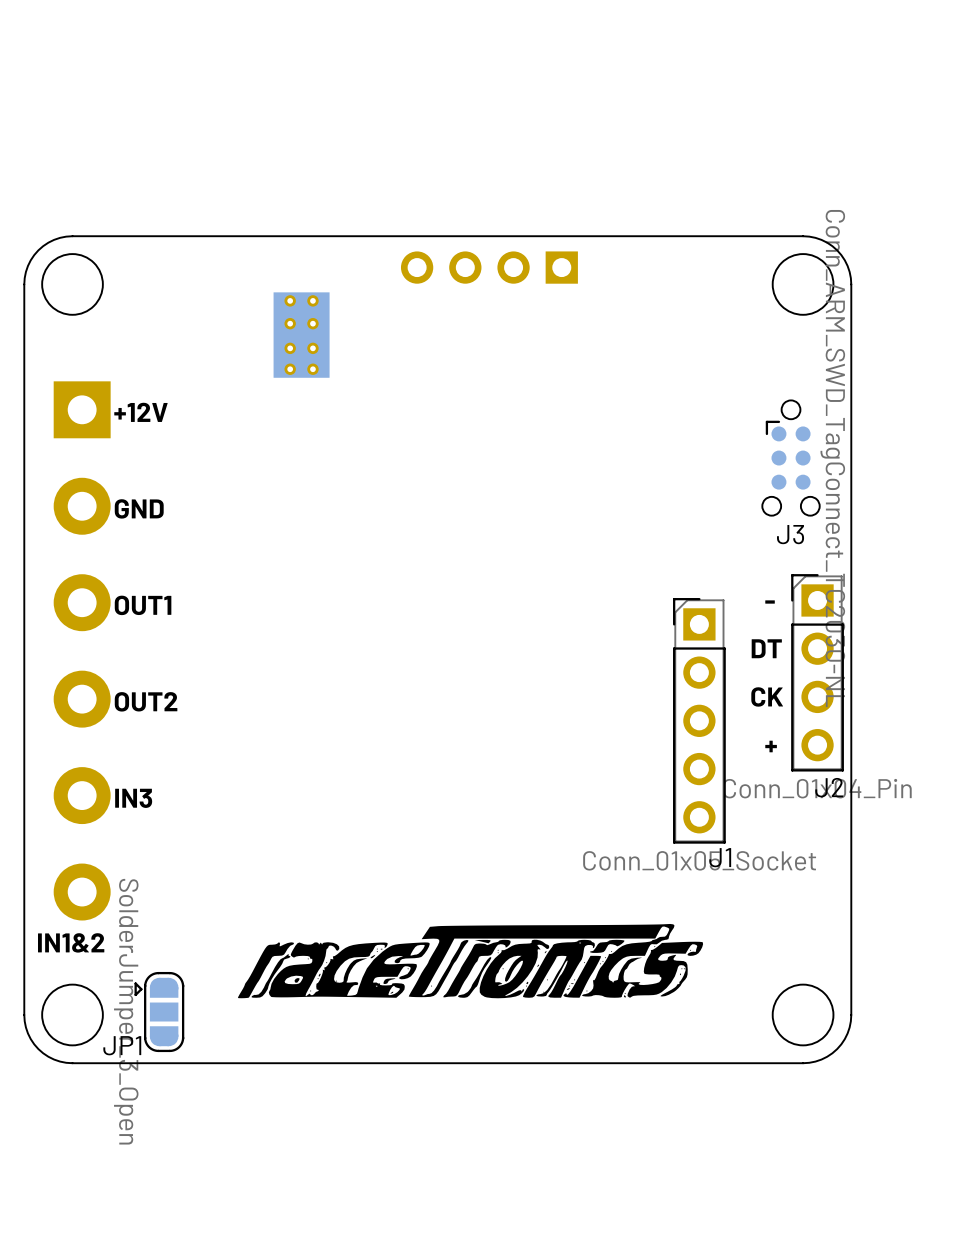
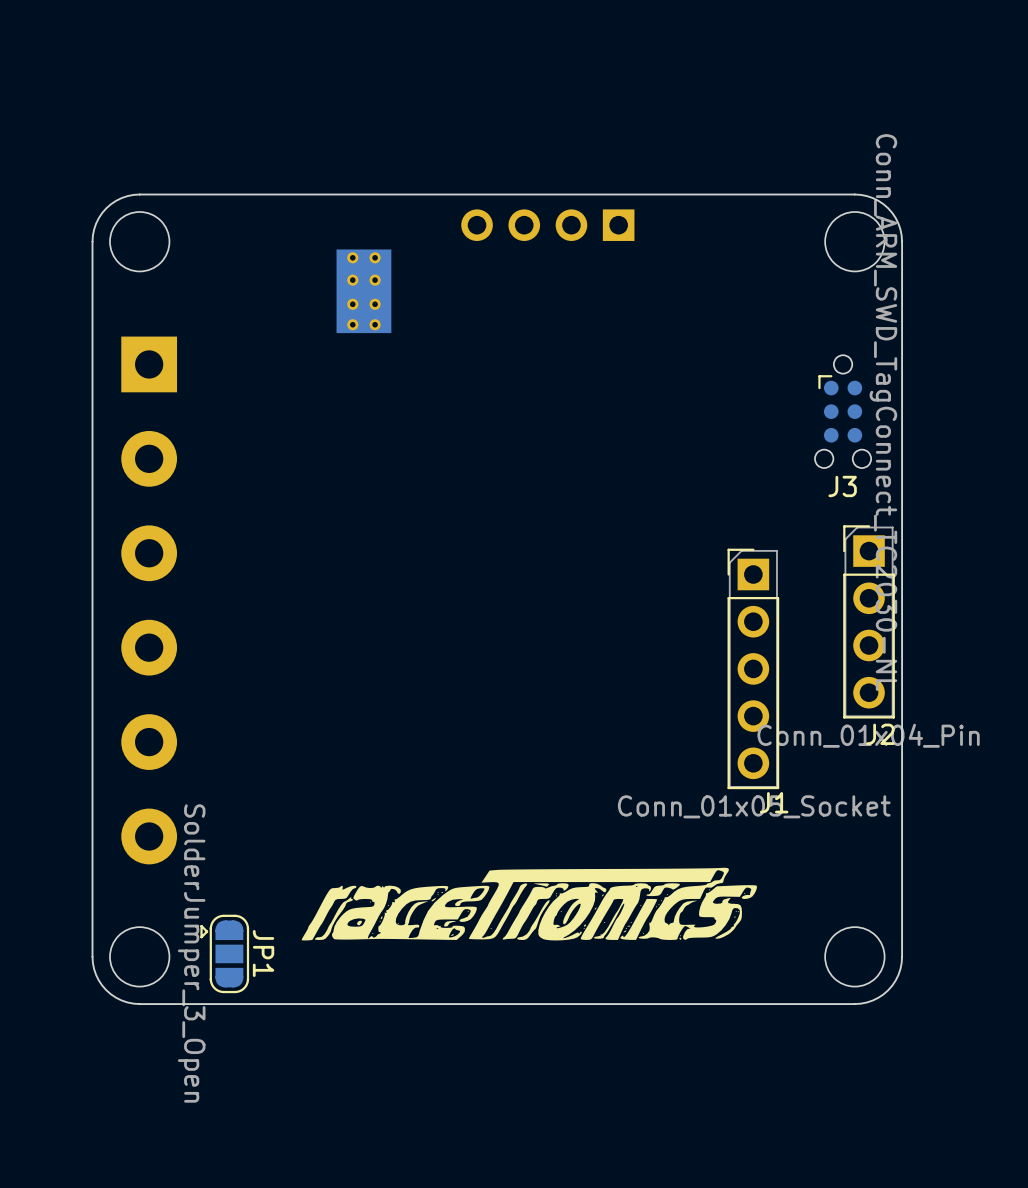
text: +12V (140, 412) -> none
text: GND (139, 508) -> none
text: - (770, 602) -> none
text: OUT1 (143, 605) -> none
text: DT (766, 648) -> none
text: CK (767, 696) -> none
text: OUT2 (146, 701) -> none
text: + (771, 746) -> none
text: IN3 (133, 798) -> none
text: IN1&2 (71, 942) -> none
JP1 name rotation: 0° (122, 1045) -> 90° clockwise (263, 953)
JP1 name position: JP1 (122, 1045) -> JP1 (263, 953)

